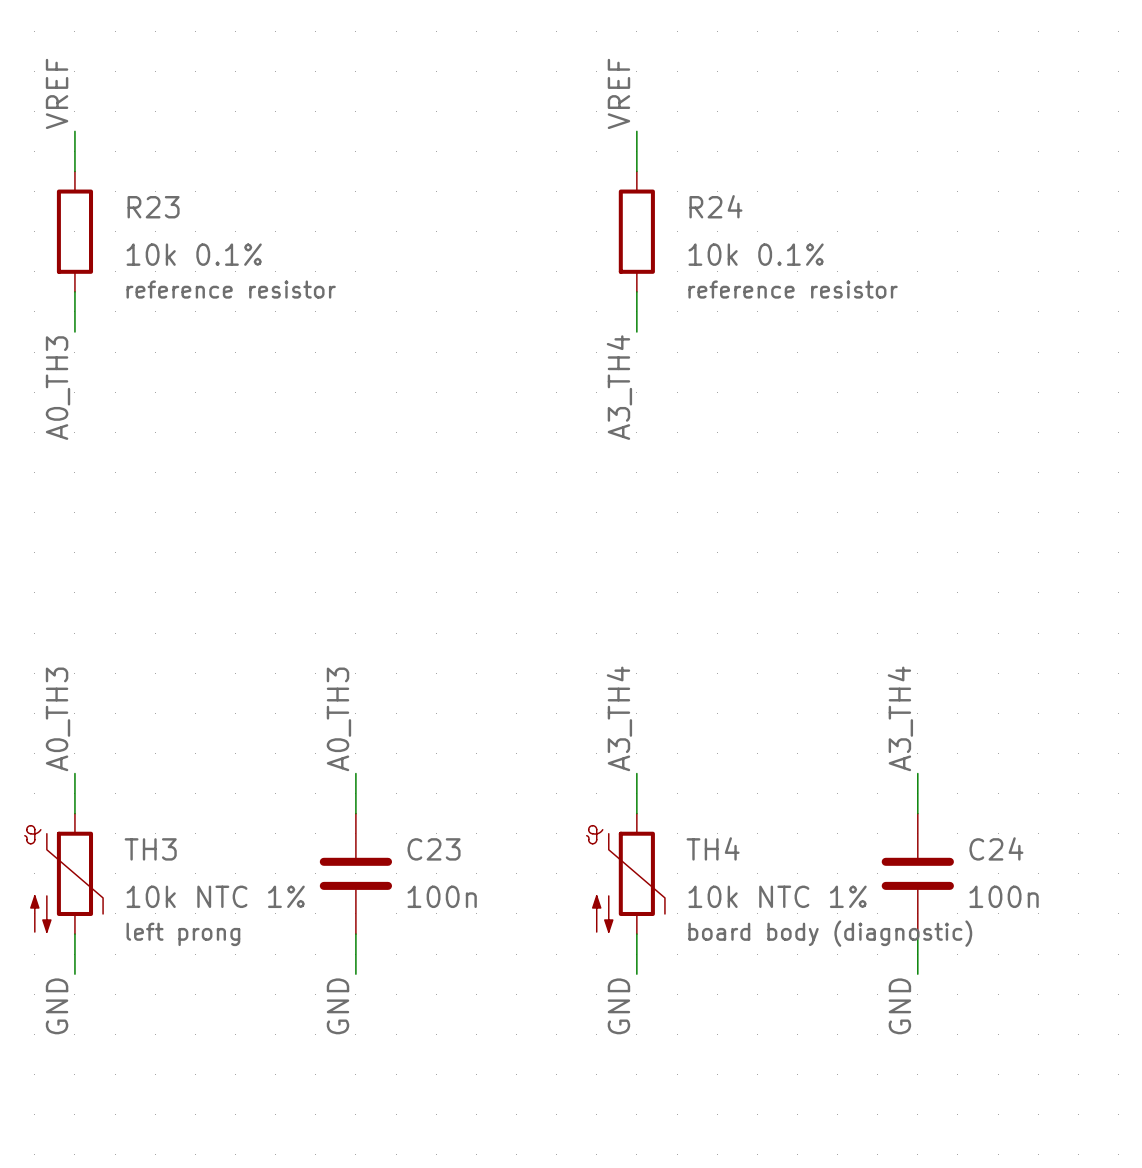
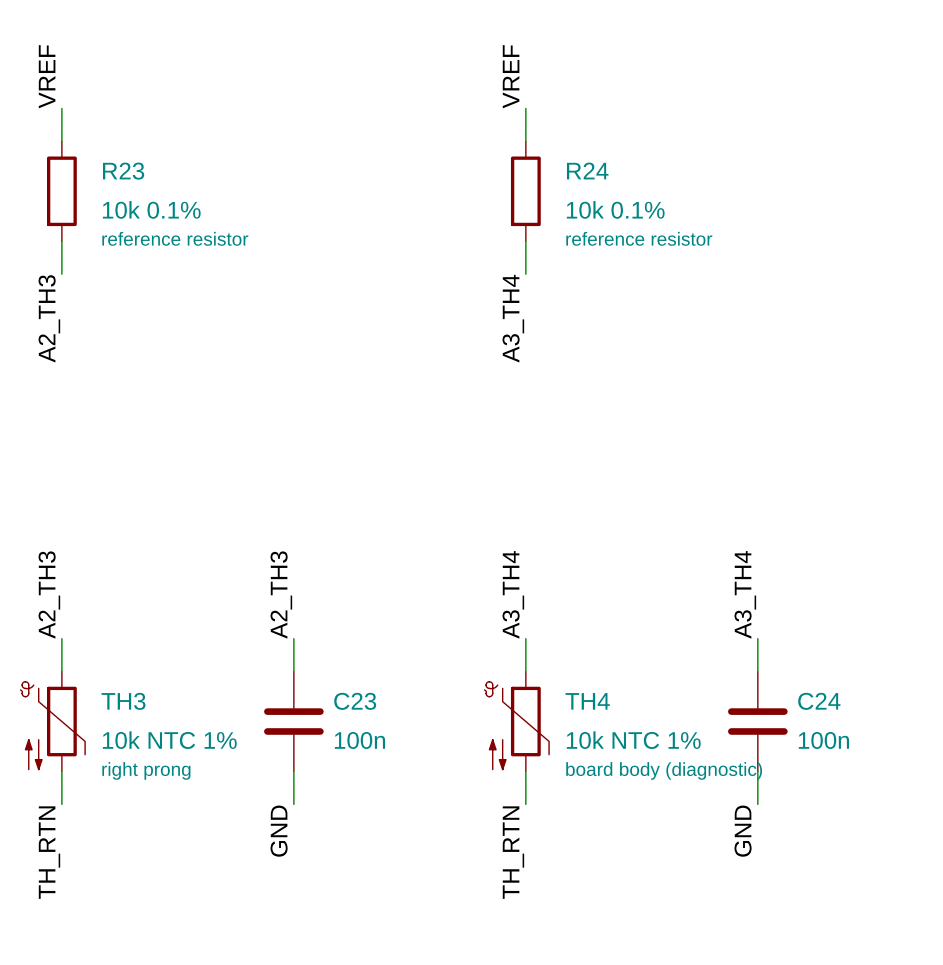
label: A0_TH3 (58, 388) -> A2_TH3 (49, 318)
label: A0_TH3 (58, 719) -> A2_TH3 (49, 595)
label: A0_TH3 (338, 719) -> A2_TH3 (281, 595)
TH3 text: left prong (183, 934) -> right prong (146, 770)
label: GND (57, 1006) -> TH_RTN (49, 852)
label: GND (618, 1006) -> TH_RTN (513, 852)

